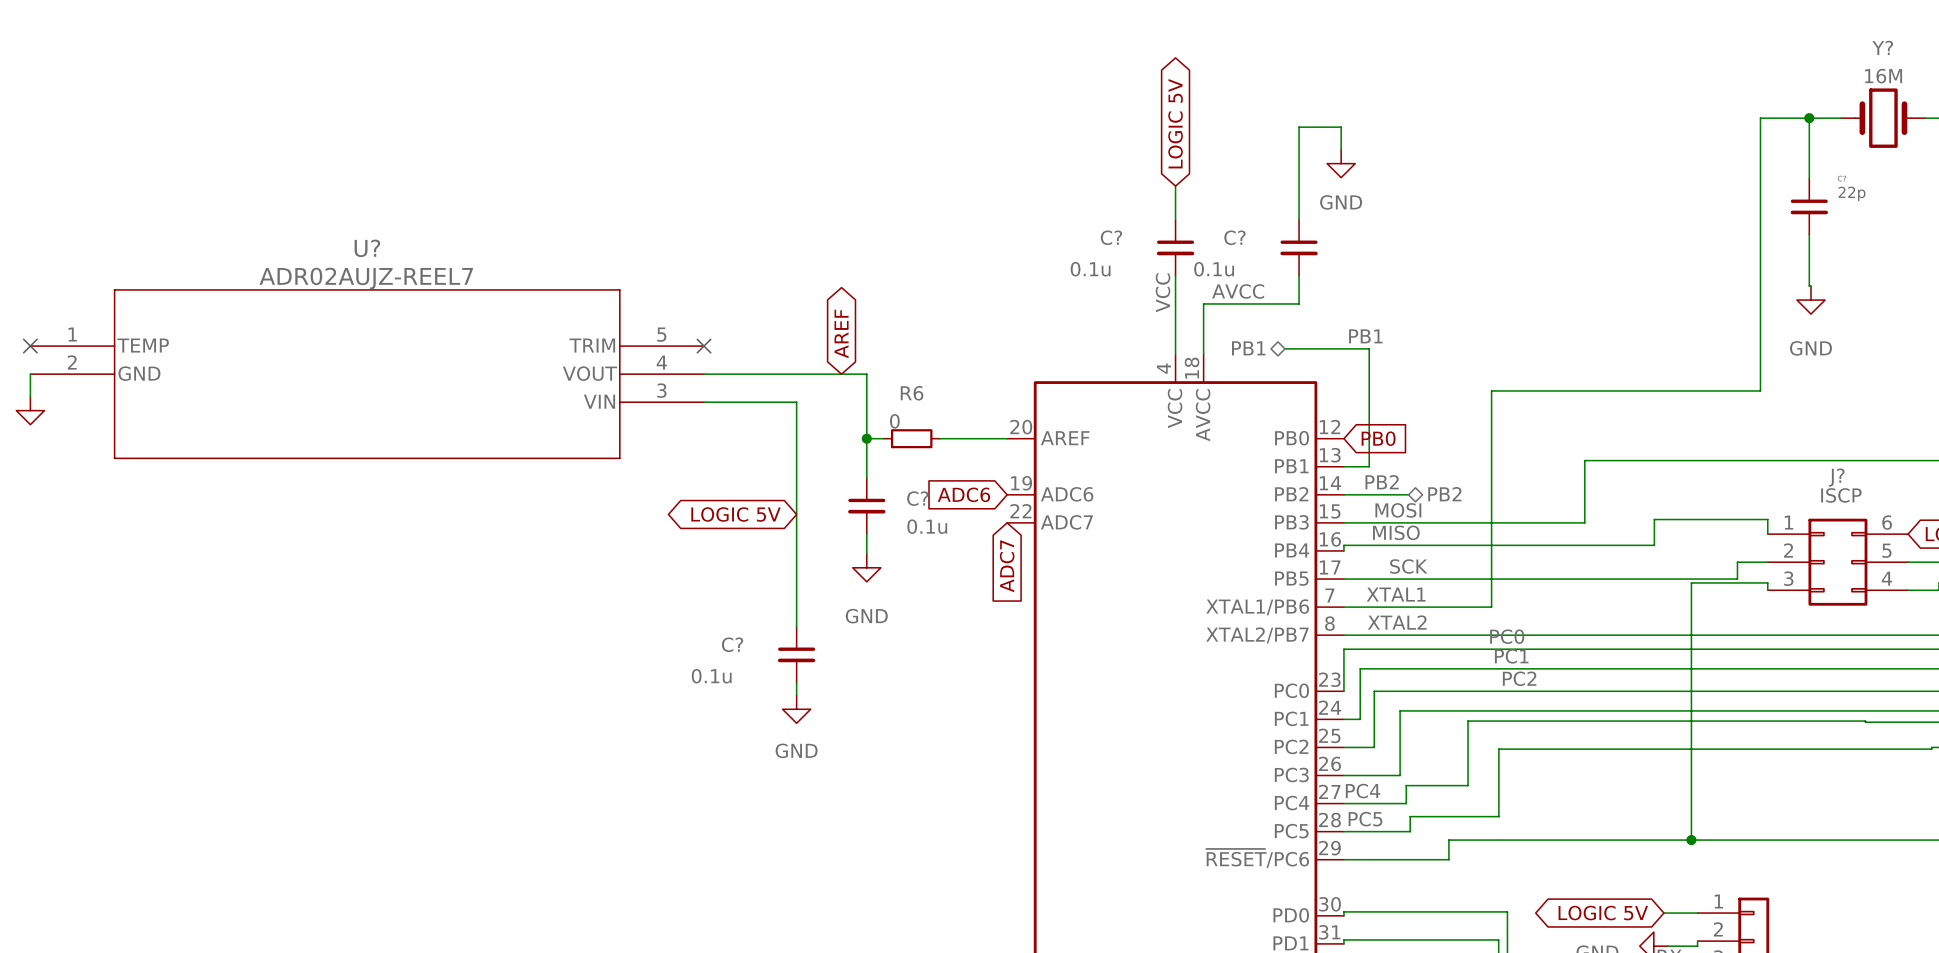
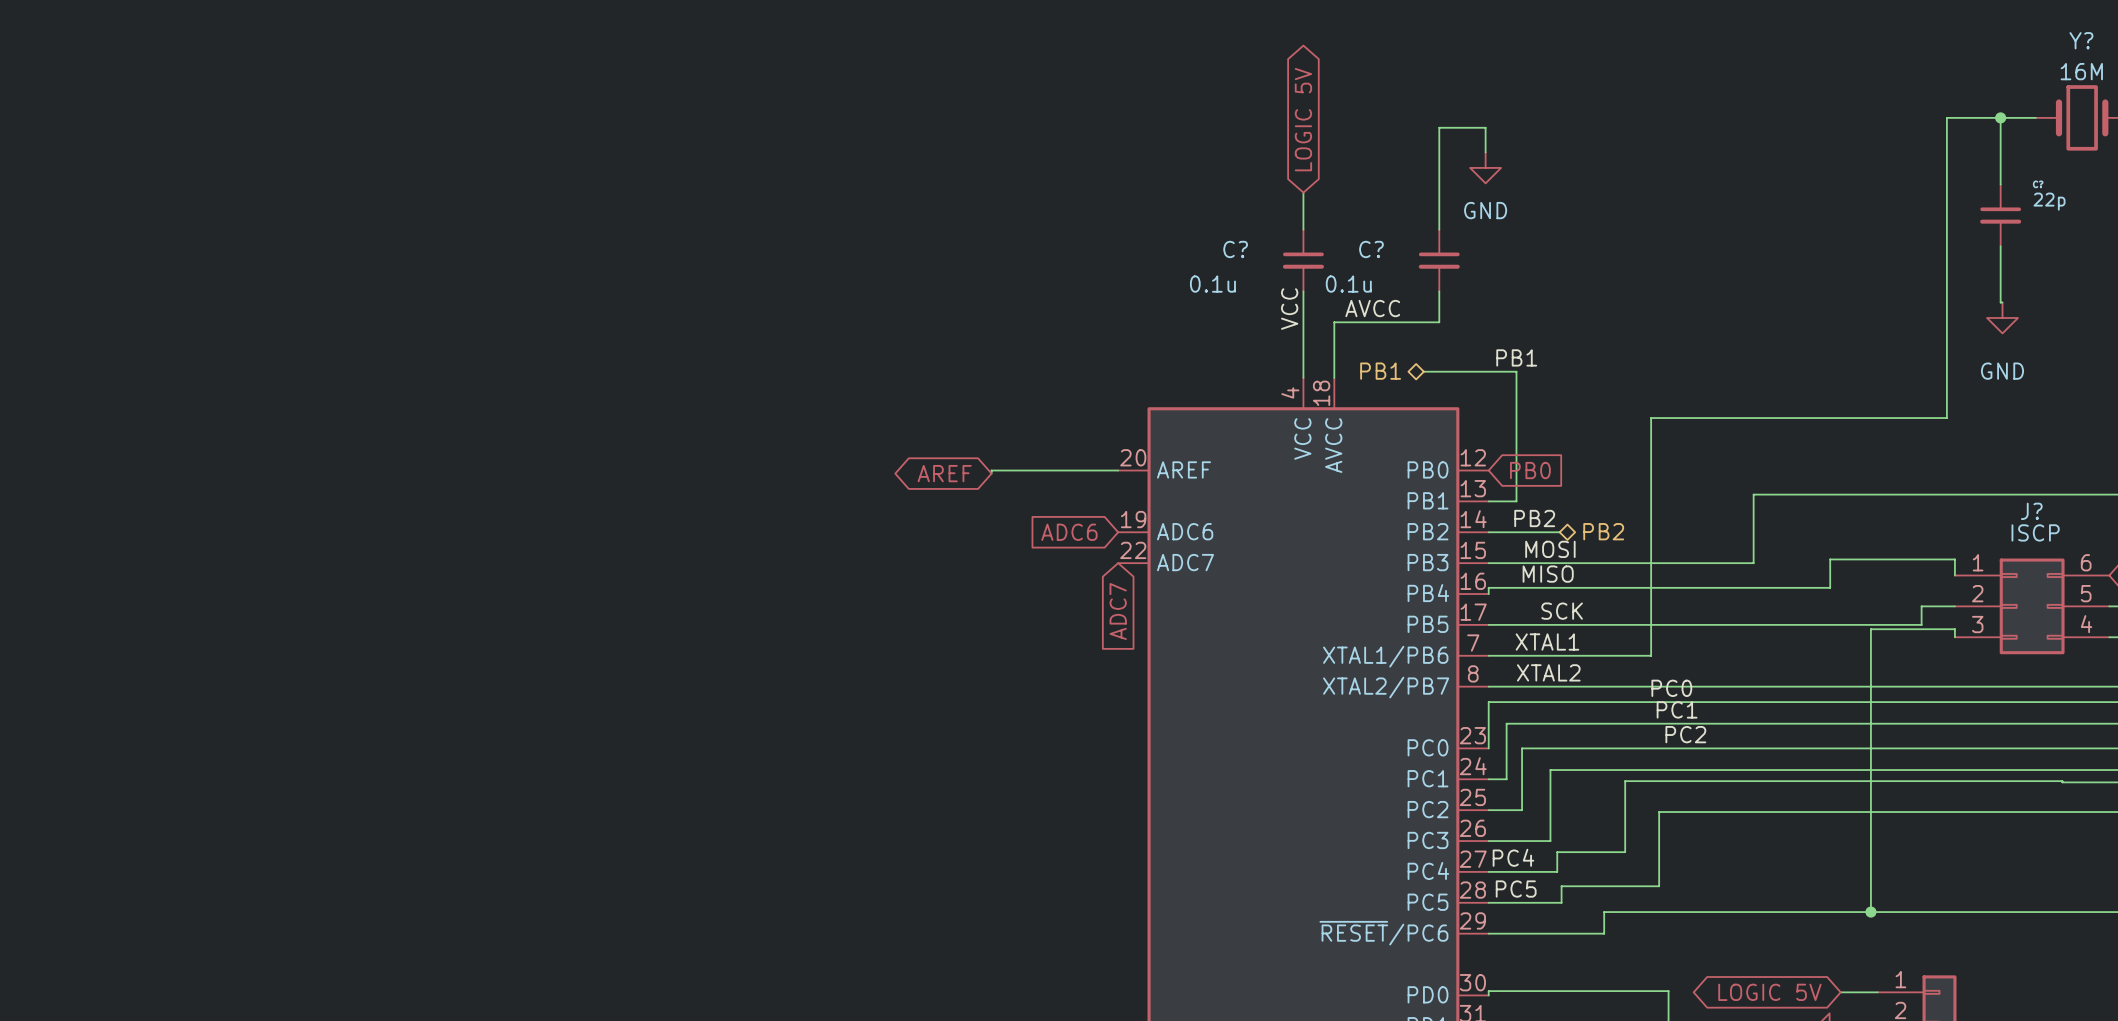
global label rotation: 0° (841, 333) -> 90° counterclockwise (944, 473)
global label position: AREF (841, 333) -> AREF (944, 473)
no-connect mark: (30, 346) -> none
no-connect mark: (704, 346) -> none
wire: (30, 374) (30, 396) -> none
U?: ADR02AUJZ-REEL7 (367, 374) -> none
wire: (704, 374) (866, 374) (866, 477) -> none
wire: (704, 402) (796, 402) (796, 626) -> none
power symbol: (30, 410) -> none
wire: (866, 438) (883, 438) -> none
junction: (866, 438) -> none
R6: 0 (911, 438) -> none
wire: none -> (1044, 470) (991, 470) (991, 473)
C?: 0.1u (866, 506) -> none
global label: LOGIC 5V (735, 514) -> none
wire: (866, 534) (866, 553) -> none
power symbol: GND (866, 567) -> none
C?: 0.1u (796, 654) -> none
wire: (796, 682) (796, 695) -> none
power symbol: GND (796, 709) -> none

